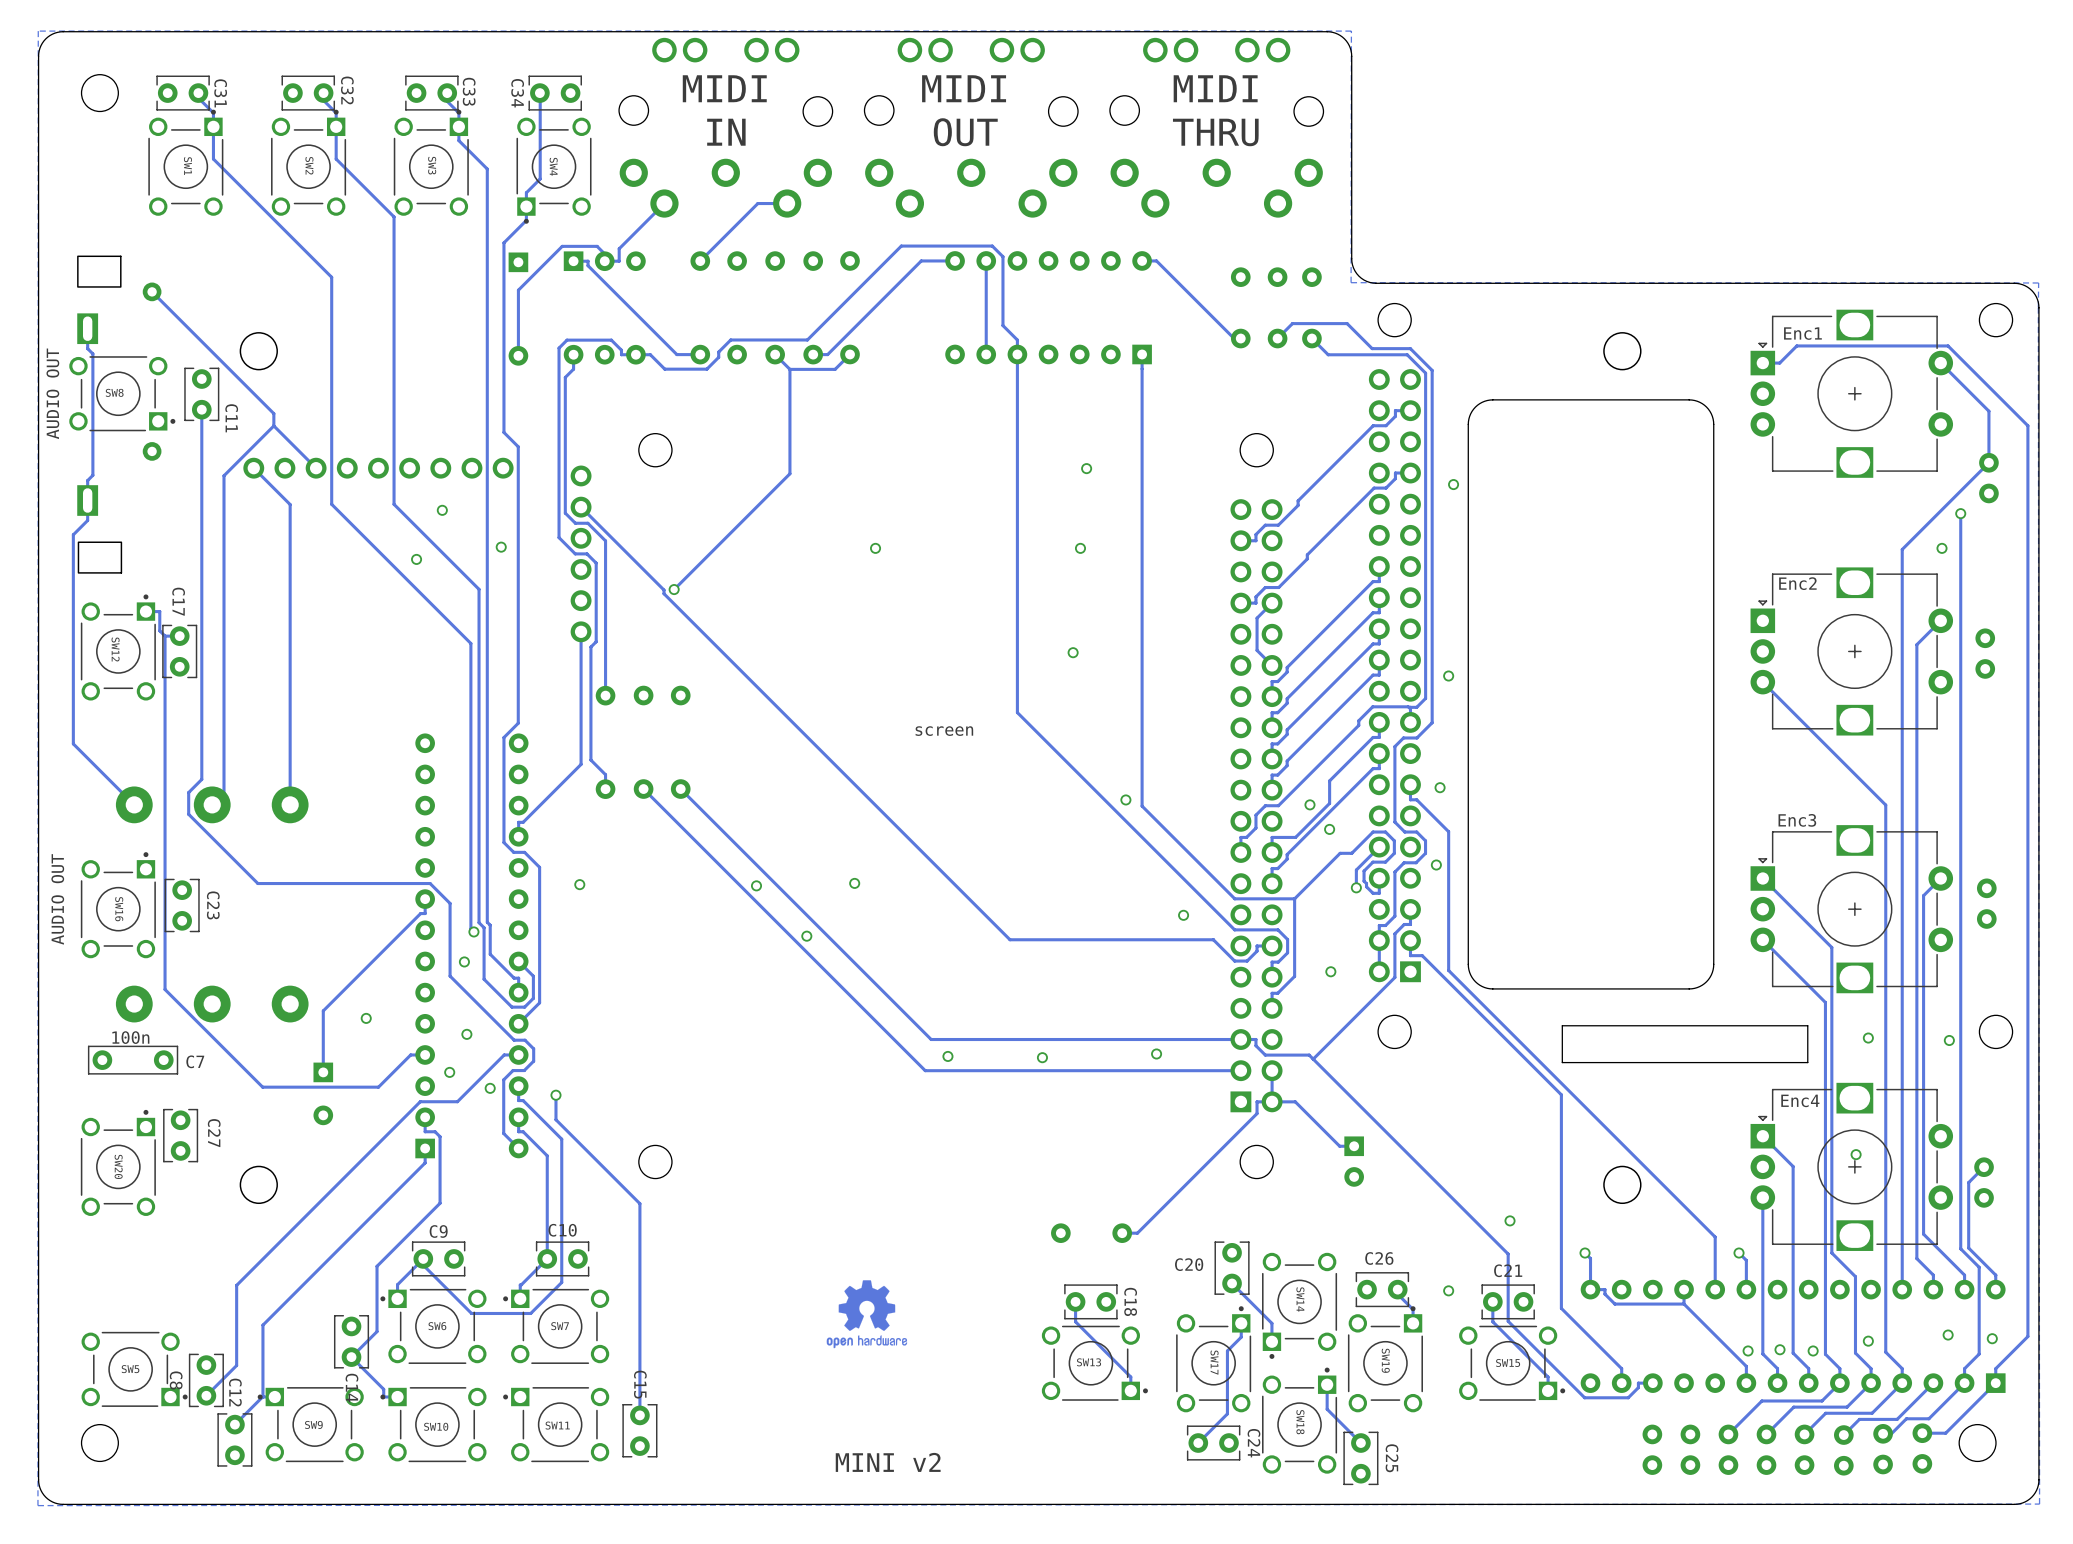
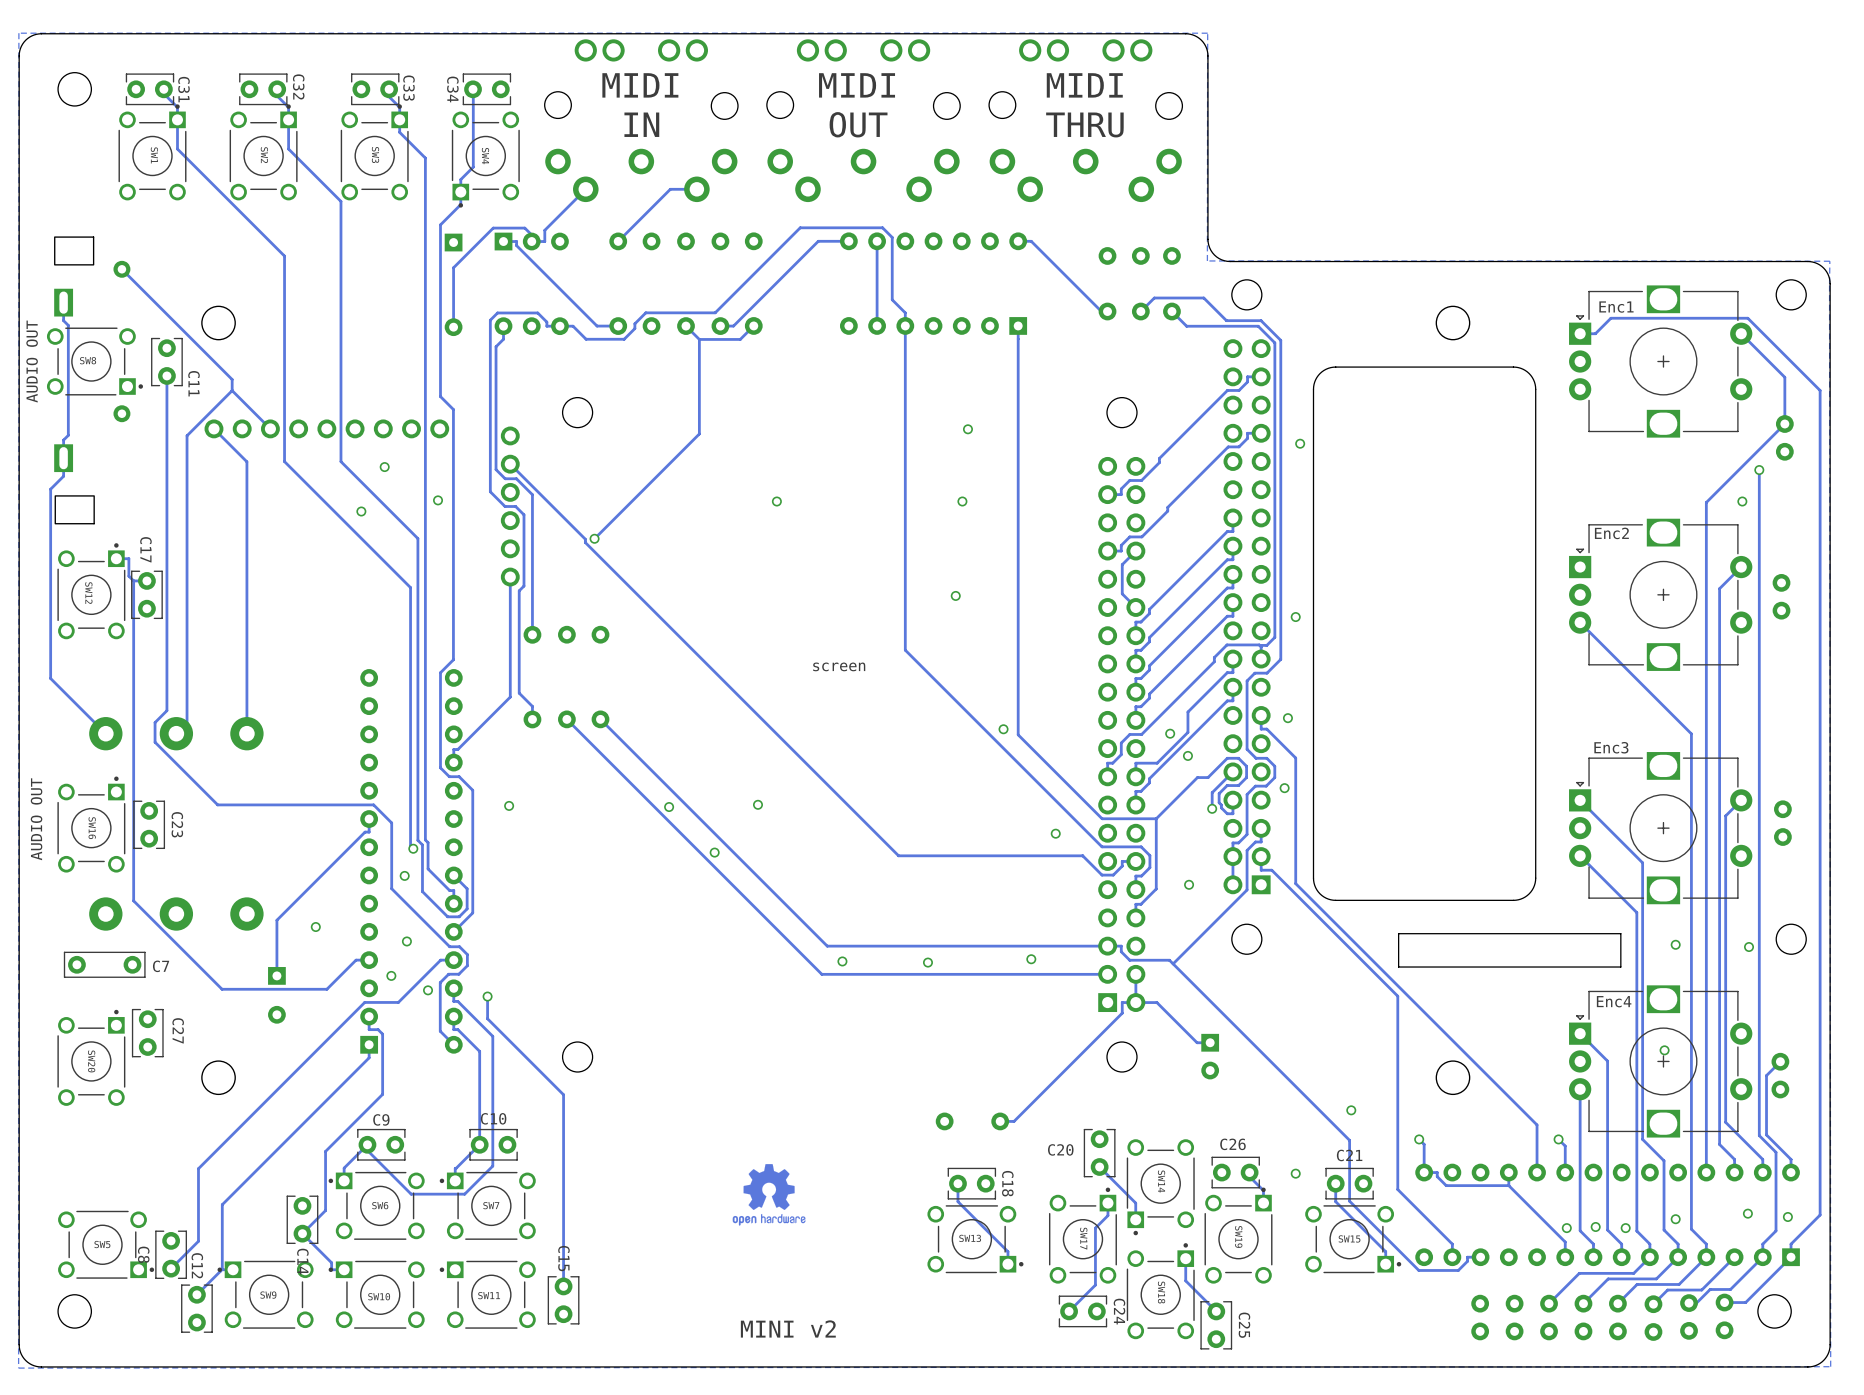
C7 value: 100n (130, 1037) -> none

